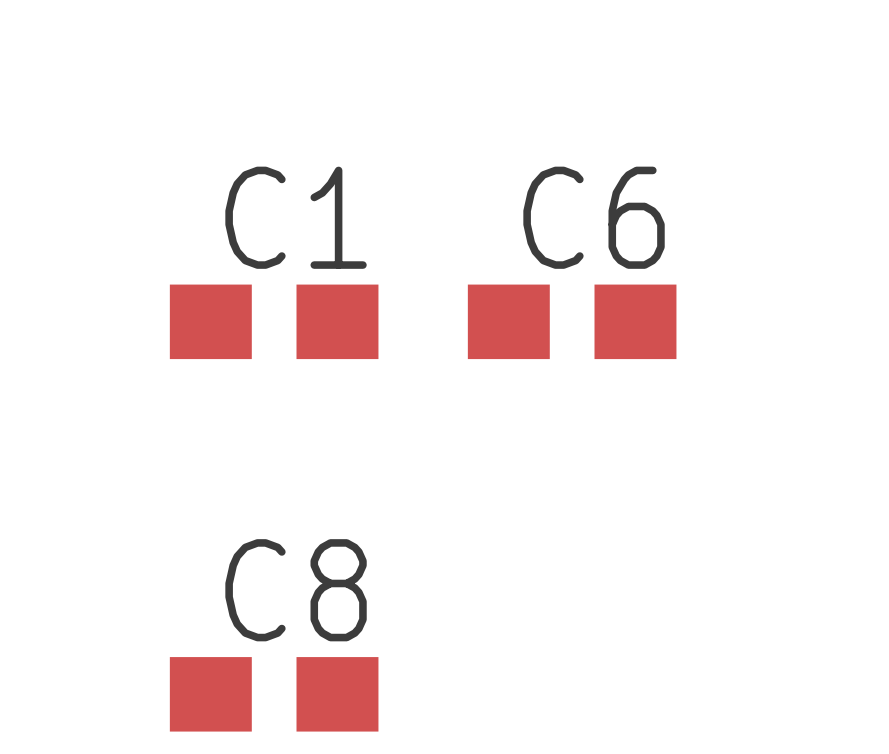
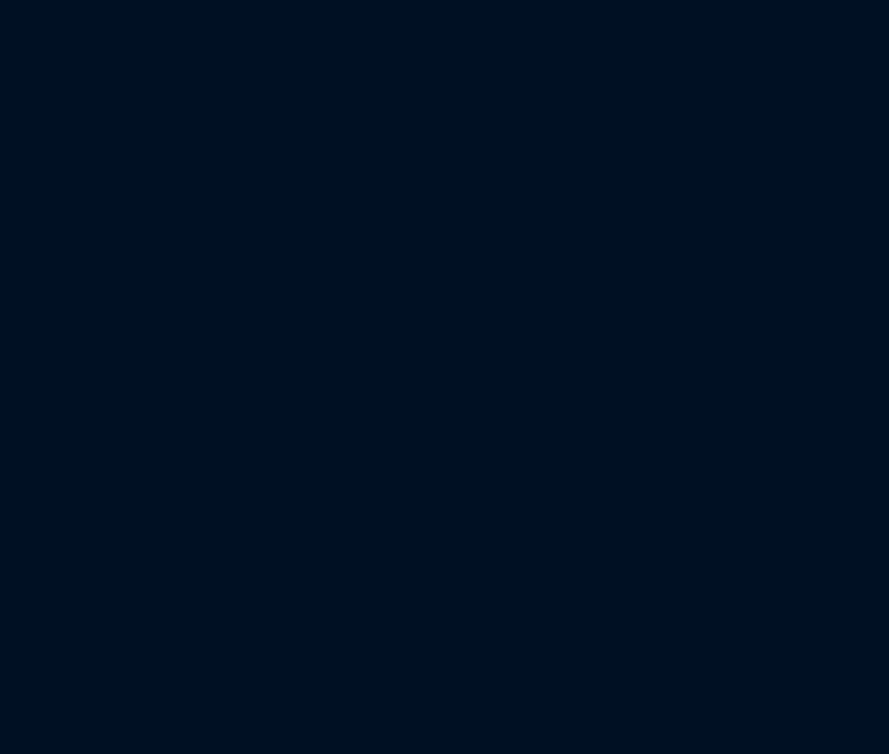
C1: (274, 321) -> none
C6: (572, 321) -> none
C8: (274, 694) -> none

